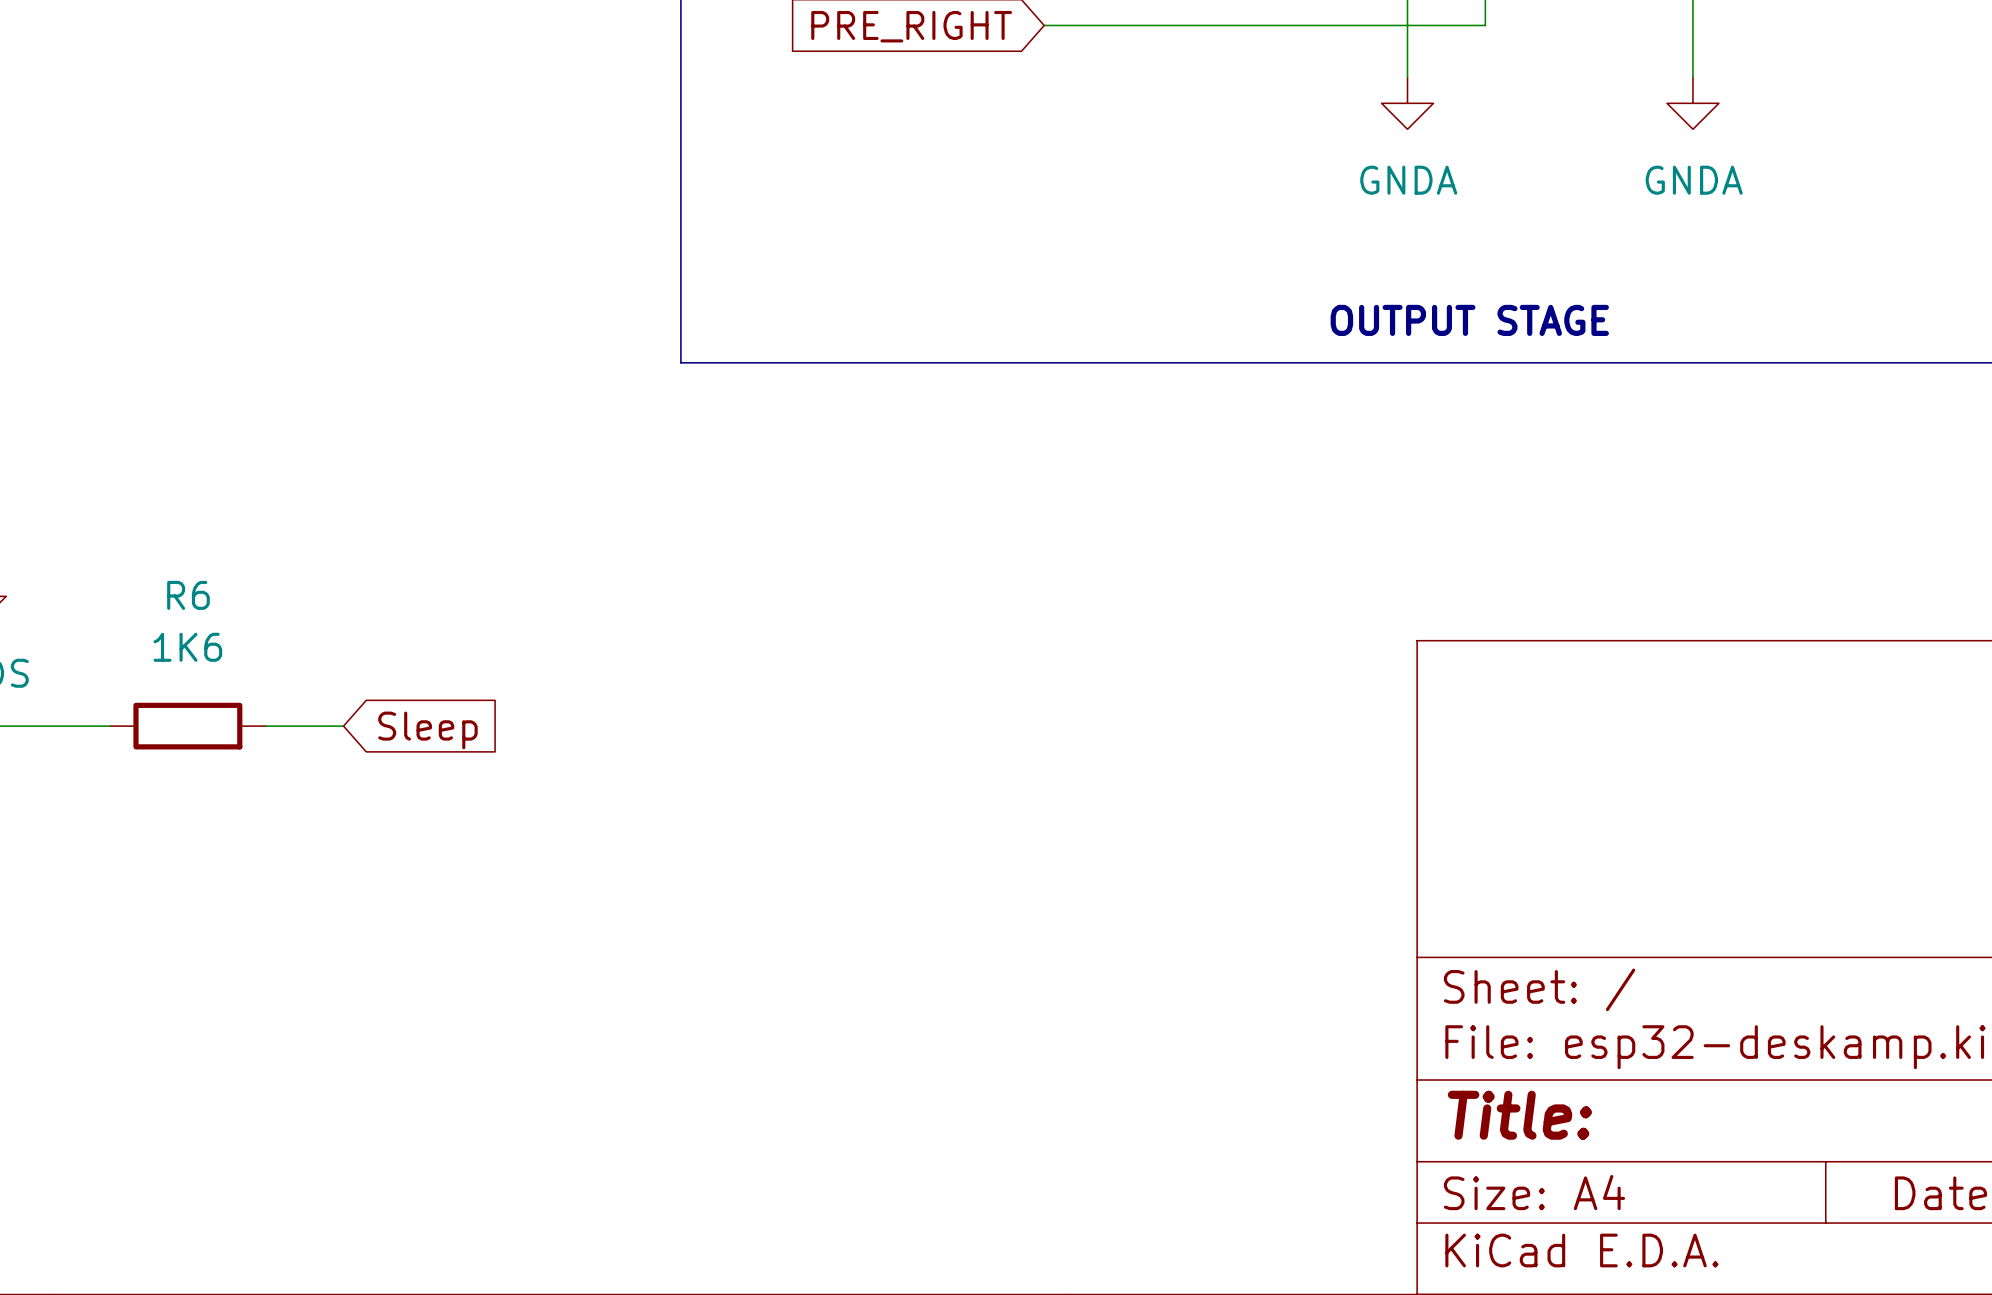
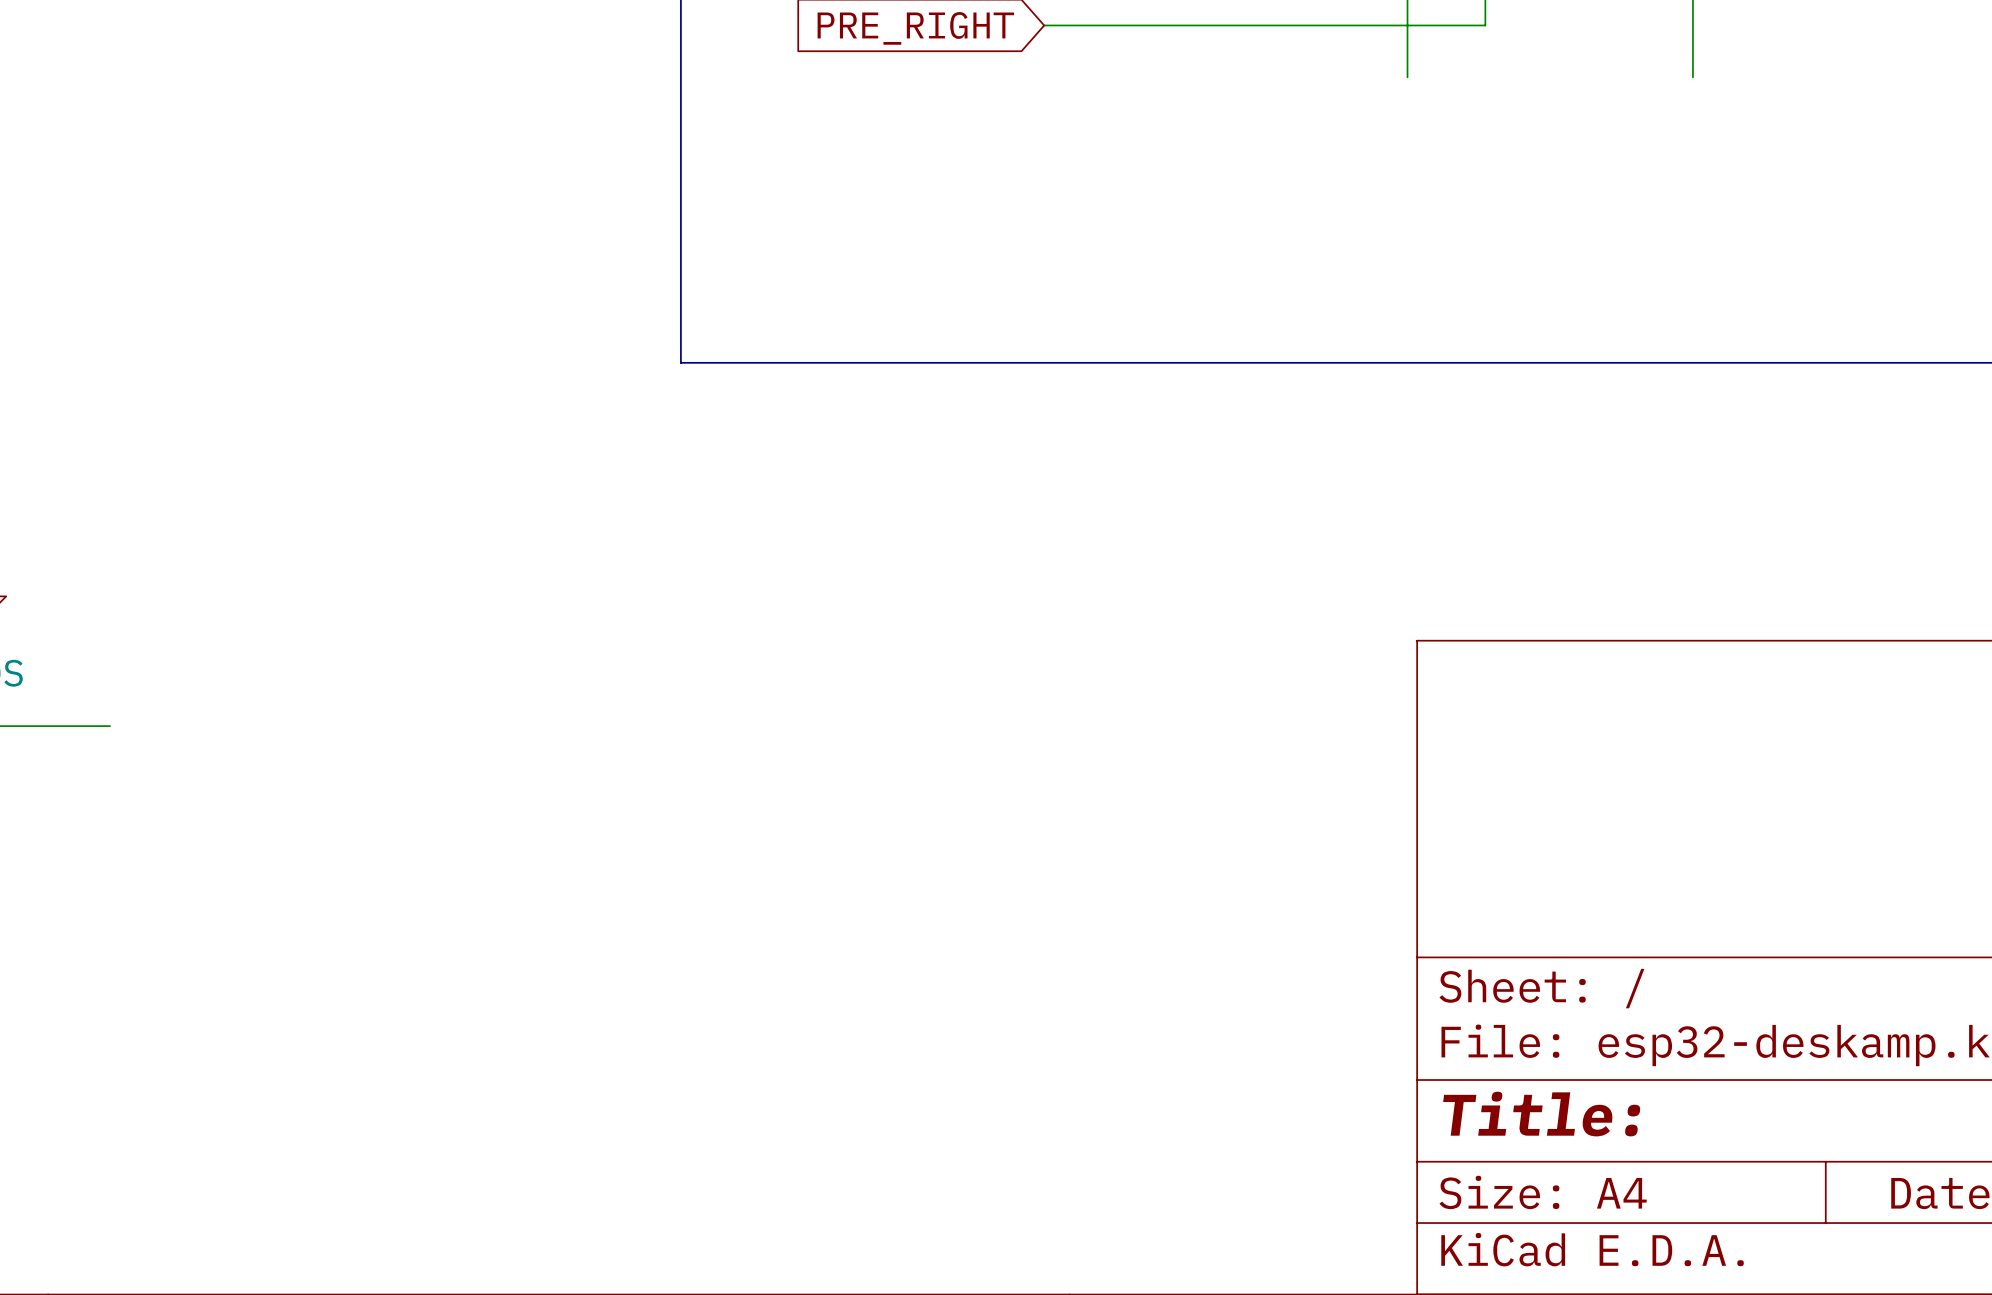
power symbol: GNDA (1407, 103) -> none
power symbol: GNDA (1692, 103) -> none
text: OUTPUT STAGE (1469, 320) -> none
R6: 1K6 (187, 726) -> none
wire: (265, 726) (343, 726) -> none
global label: Sleep (427, 730) -> none

